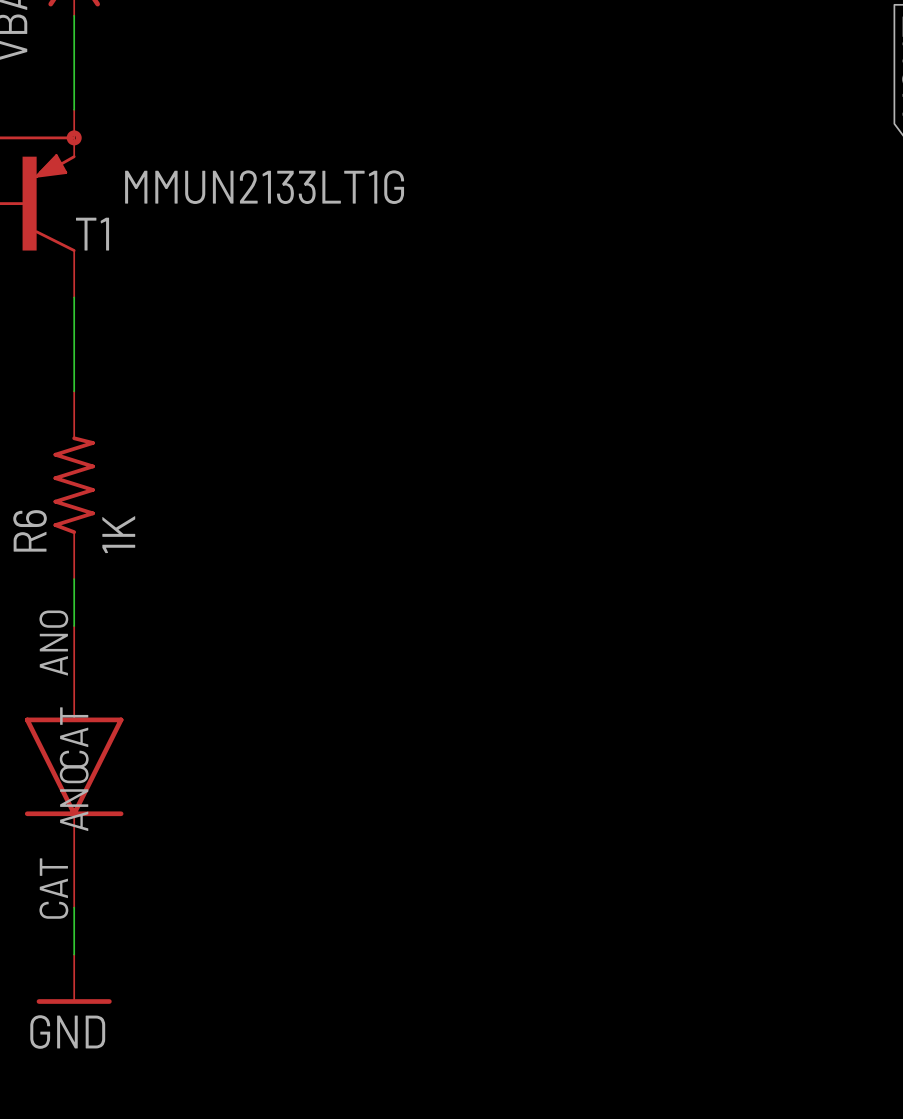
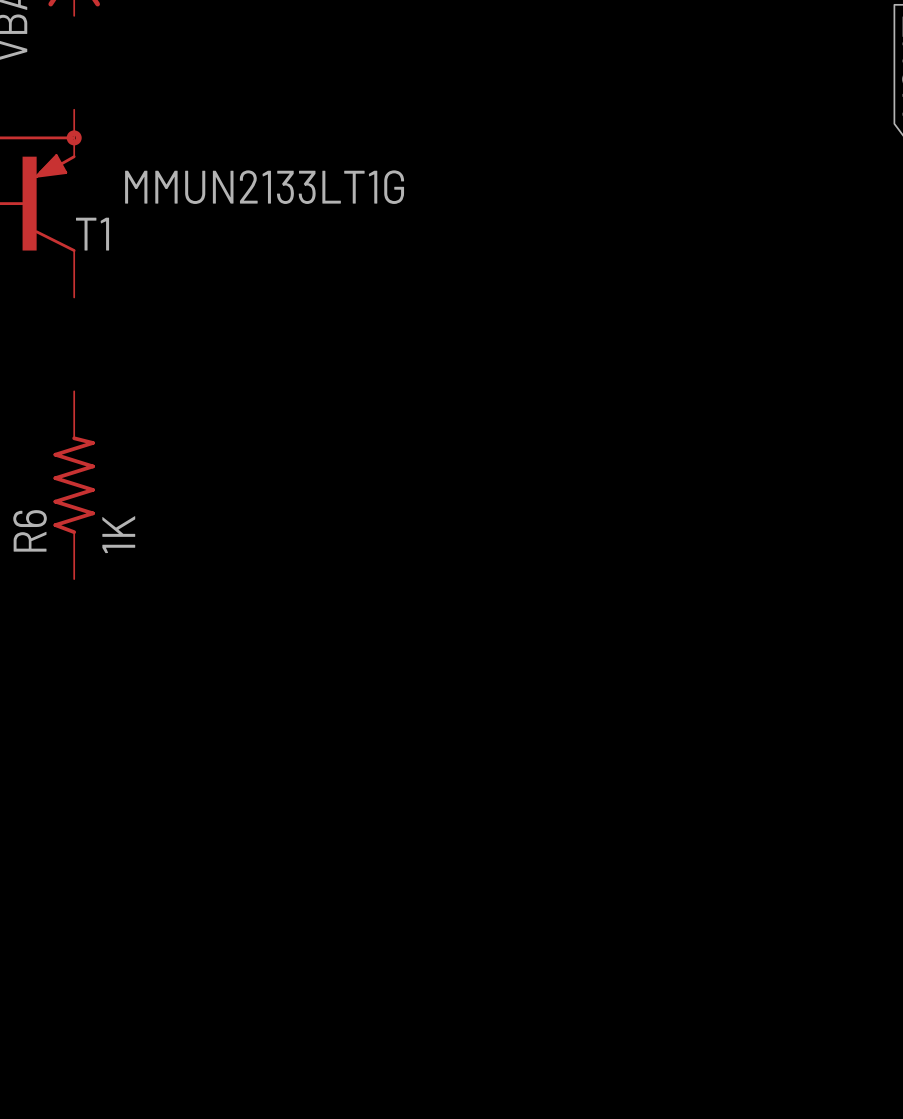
wire: (74, 15) (74, 109) -> none
wire: (74, 297) (74, 391) -> none
wire: (74, 579) (74, 626) -> none
part: (74, 766) -> none
wire: (74, 907) (74, 954) -> none
power symbol: GND (74, 979) -> none

